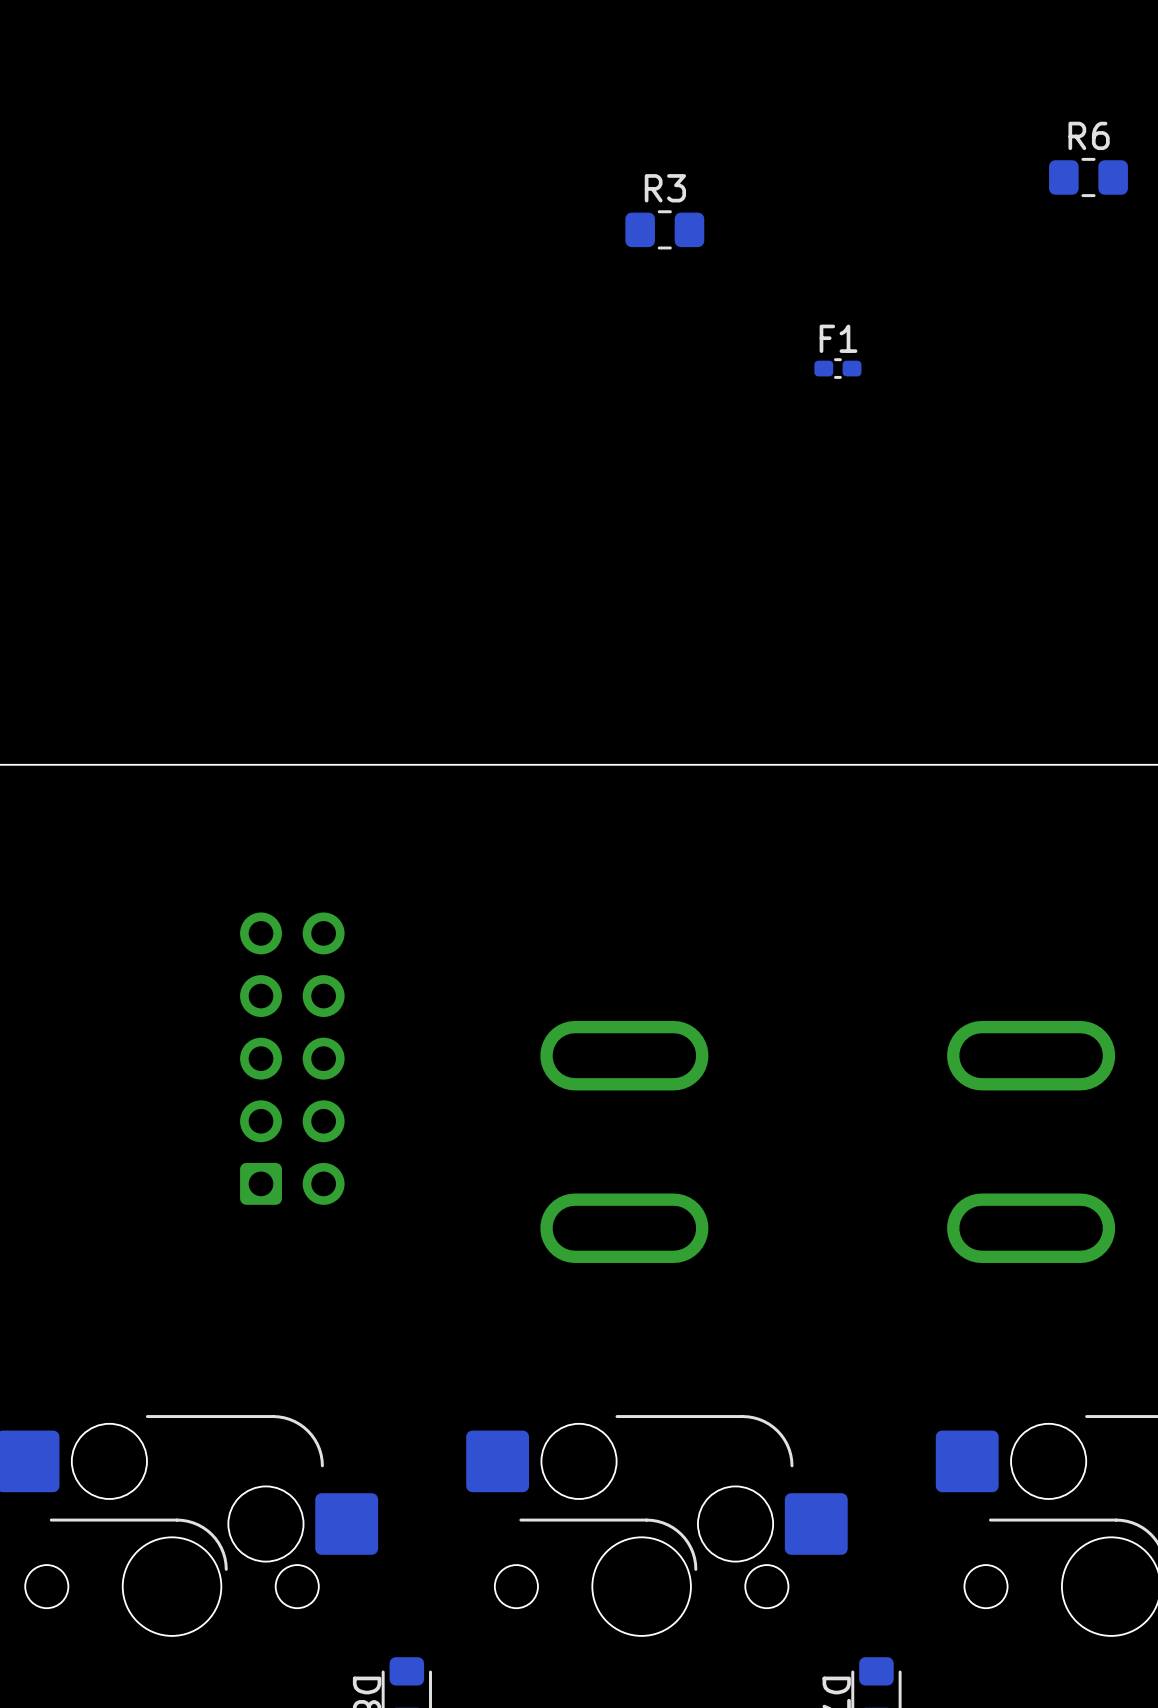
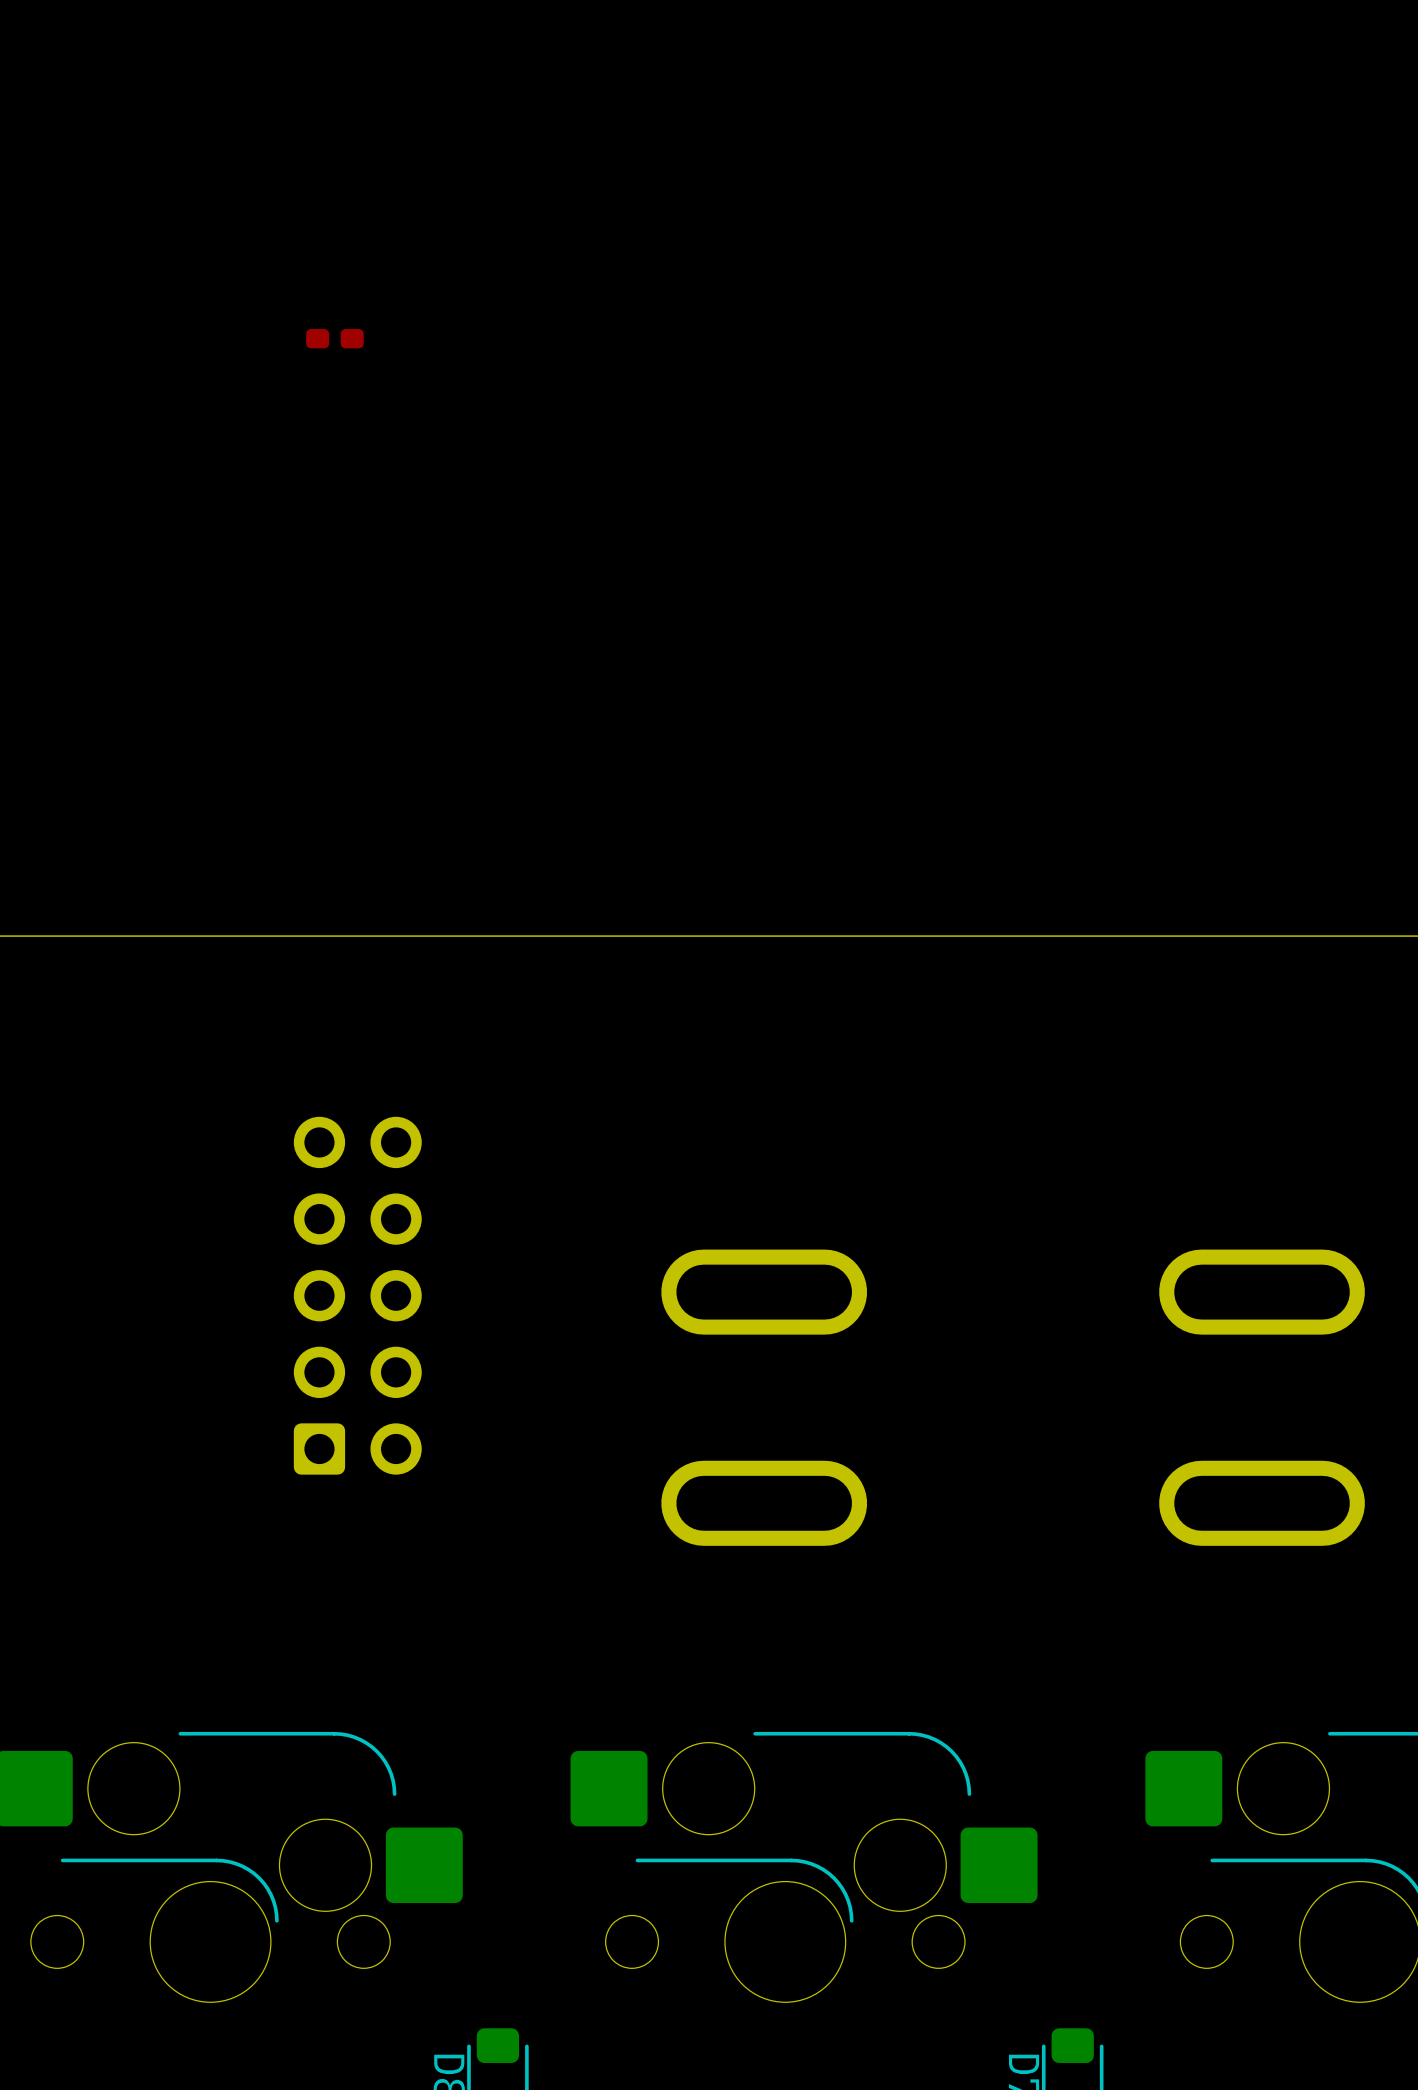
R6: (1088, 177) -> none
R3: (664, 229) -> none
F1 side: bottom (837, 368) -> top (334, 338)

